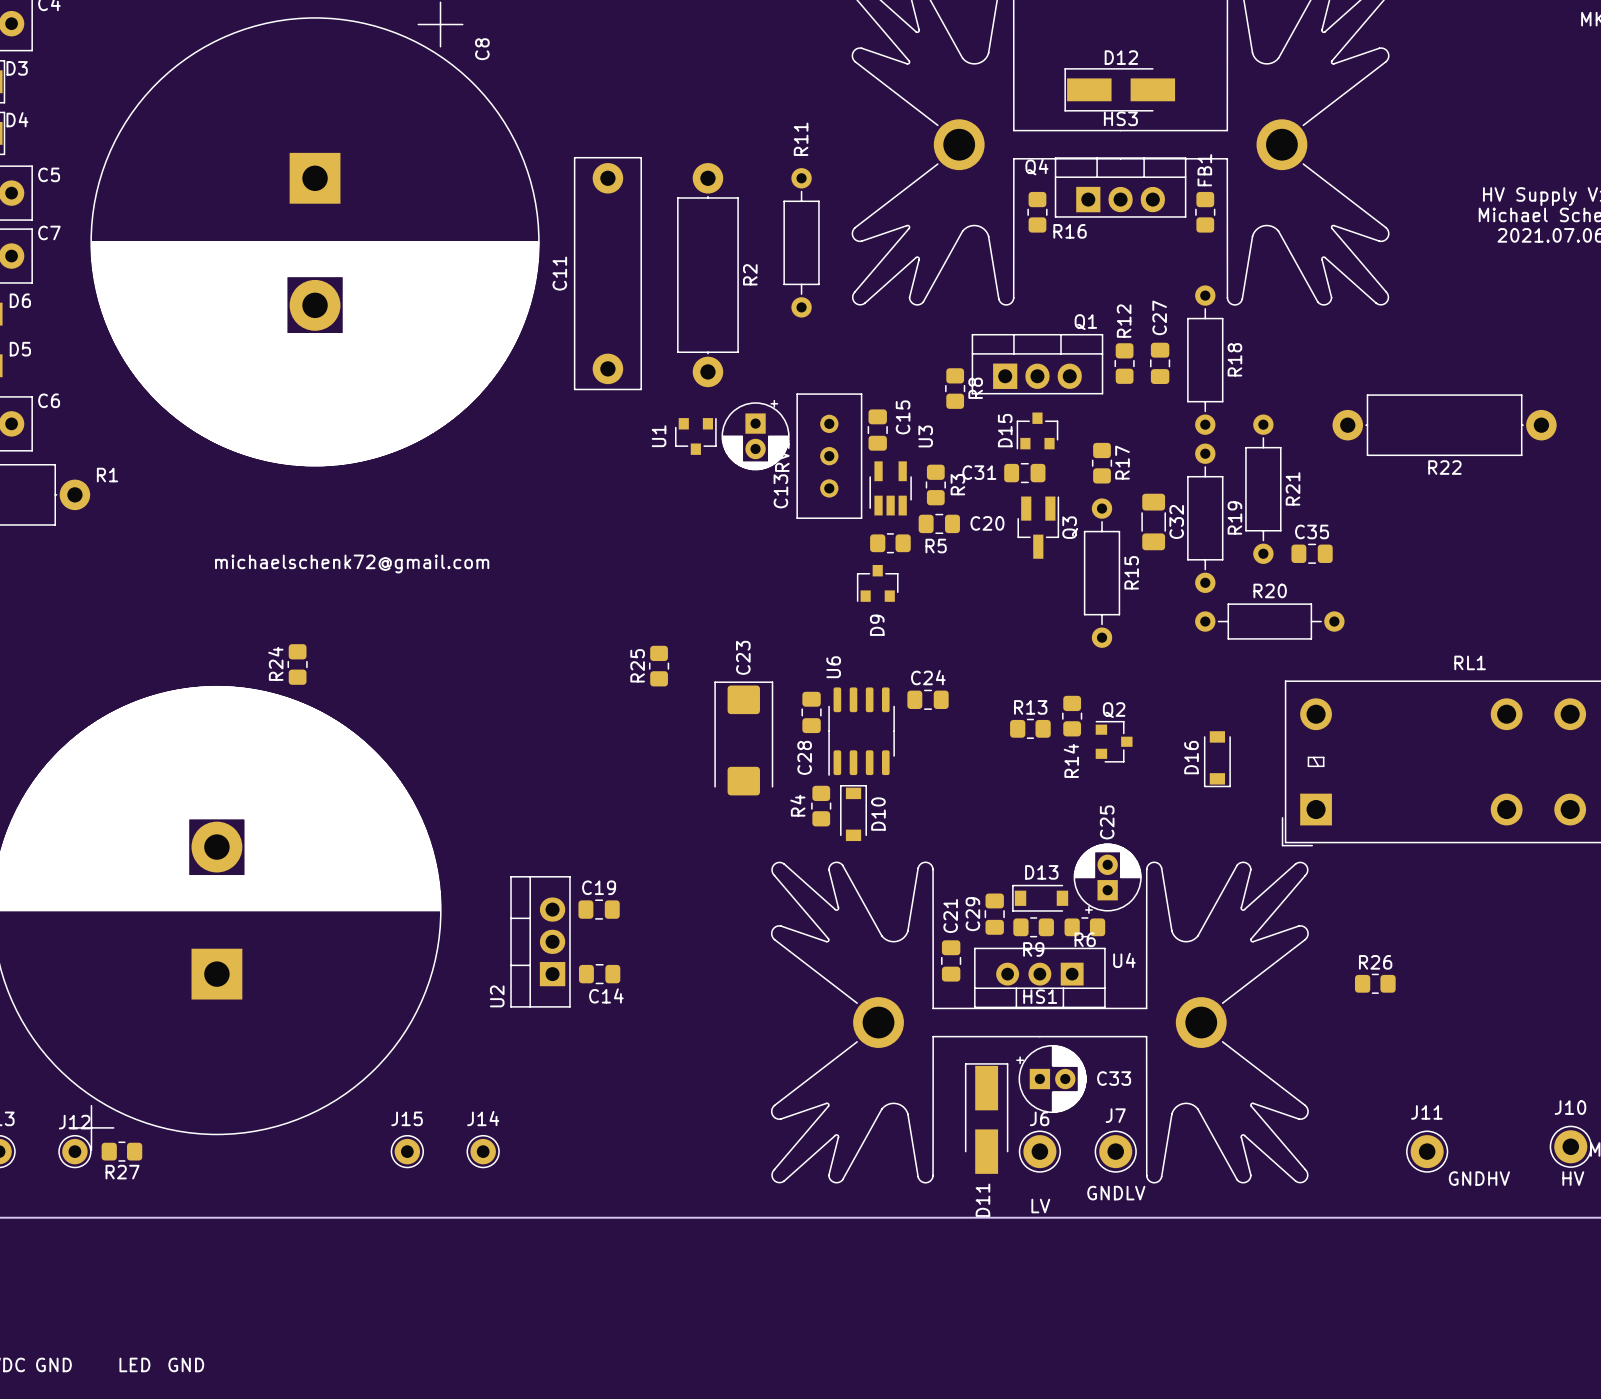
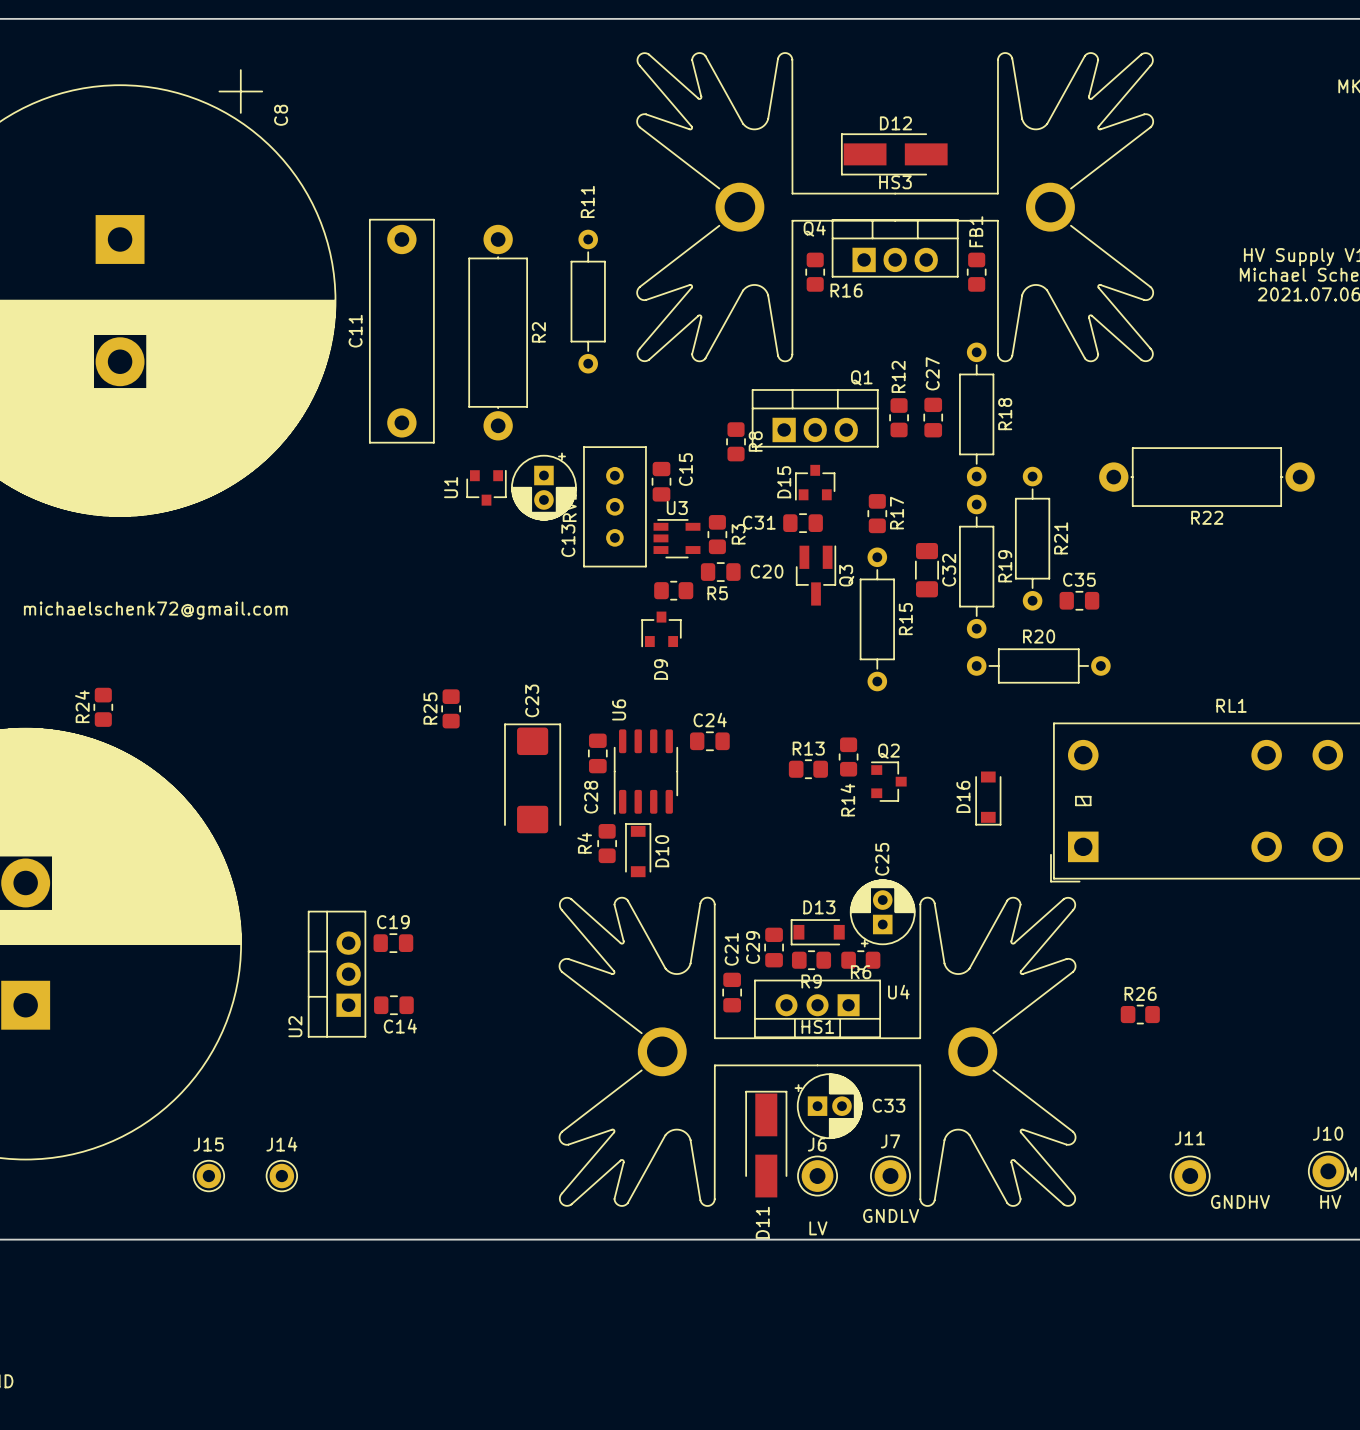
U3 name position: U3 (925, 436) -> U3 (677, 508)
U3 footprint: [869, 461, 912, 516] -> [653, 519, 701, 559]

